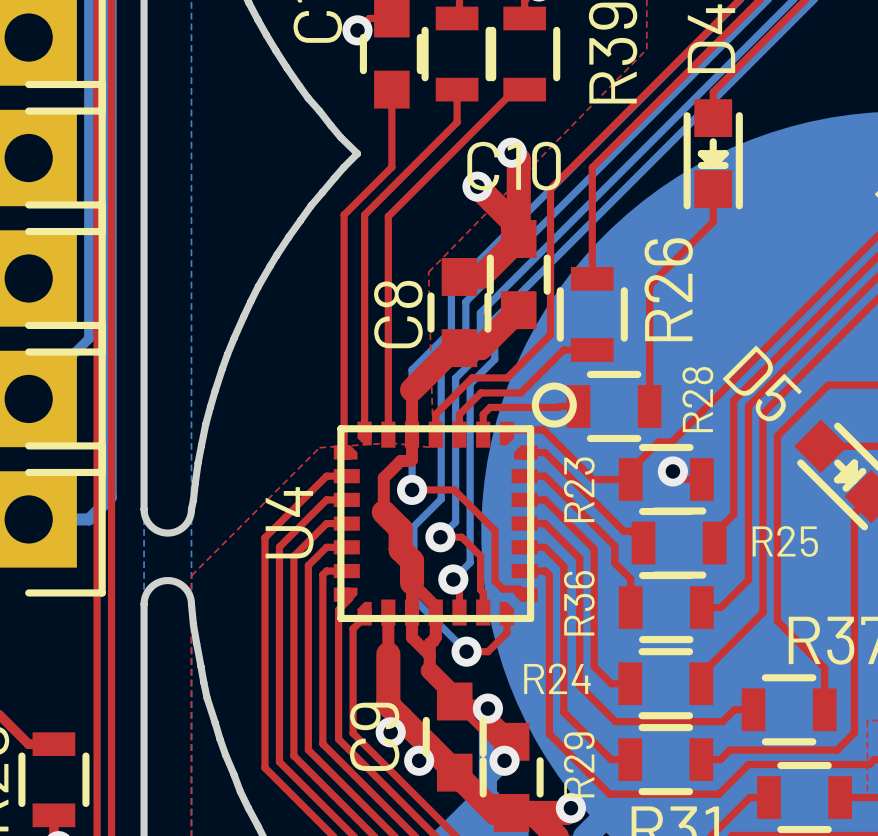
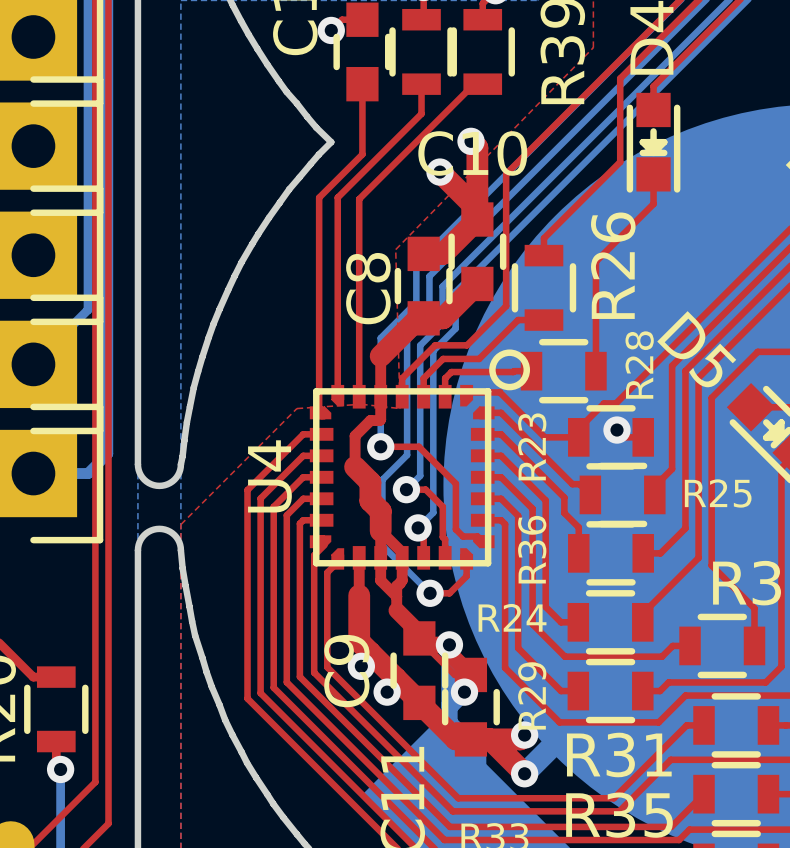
top track: (676, 83) (592, 167) (592, 259) -> (620, 78) (620, 162) (543, 238)

